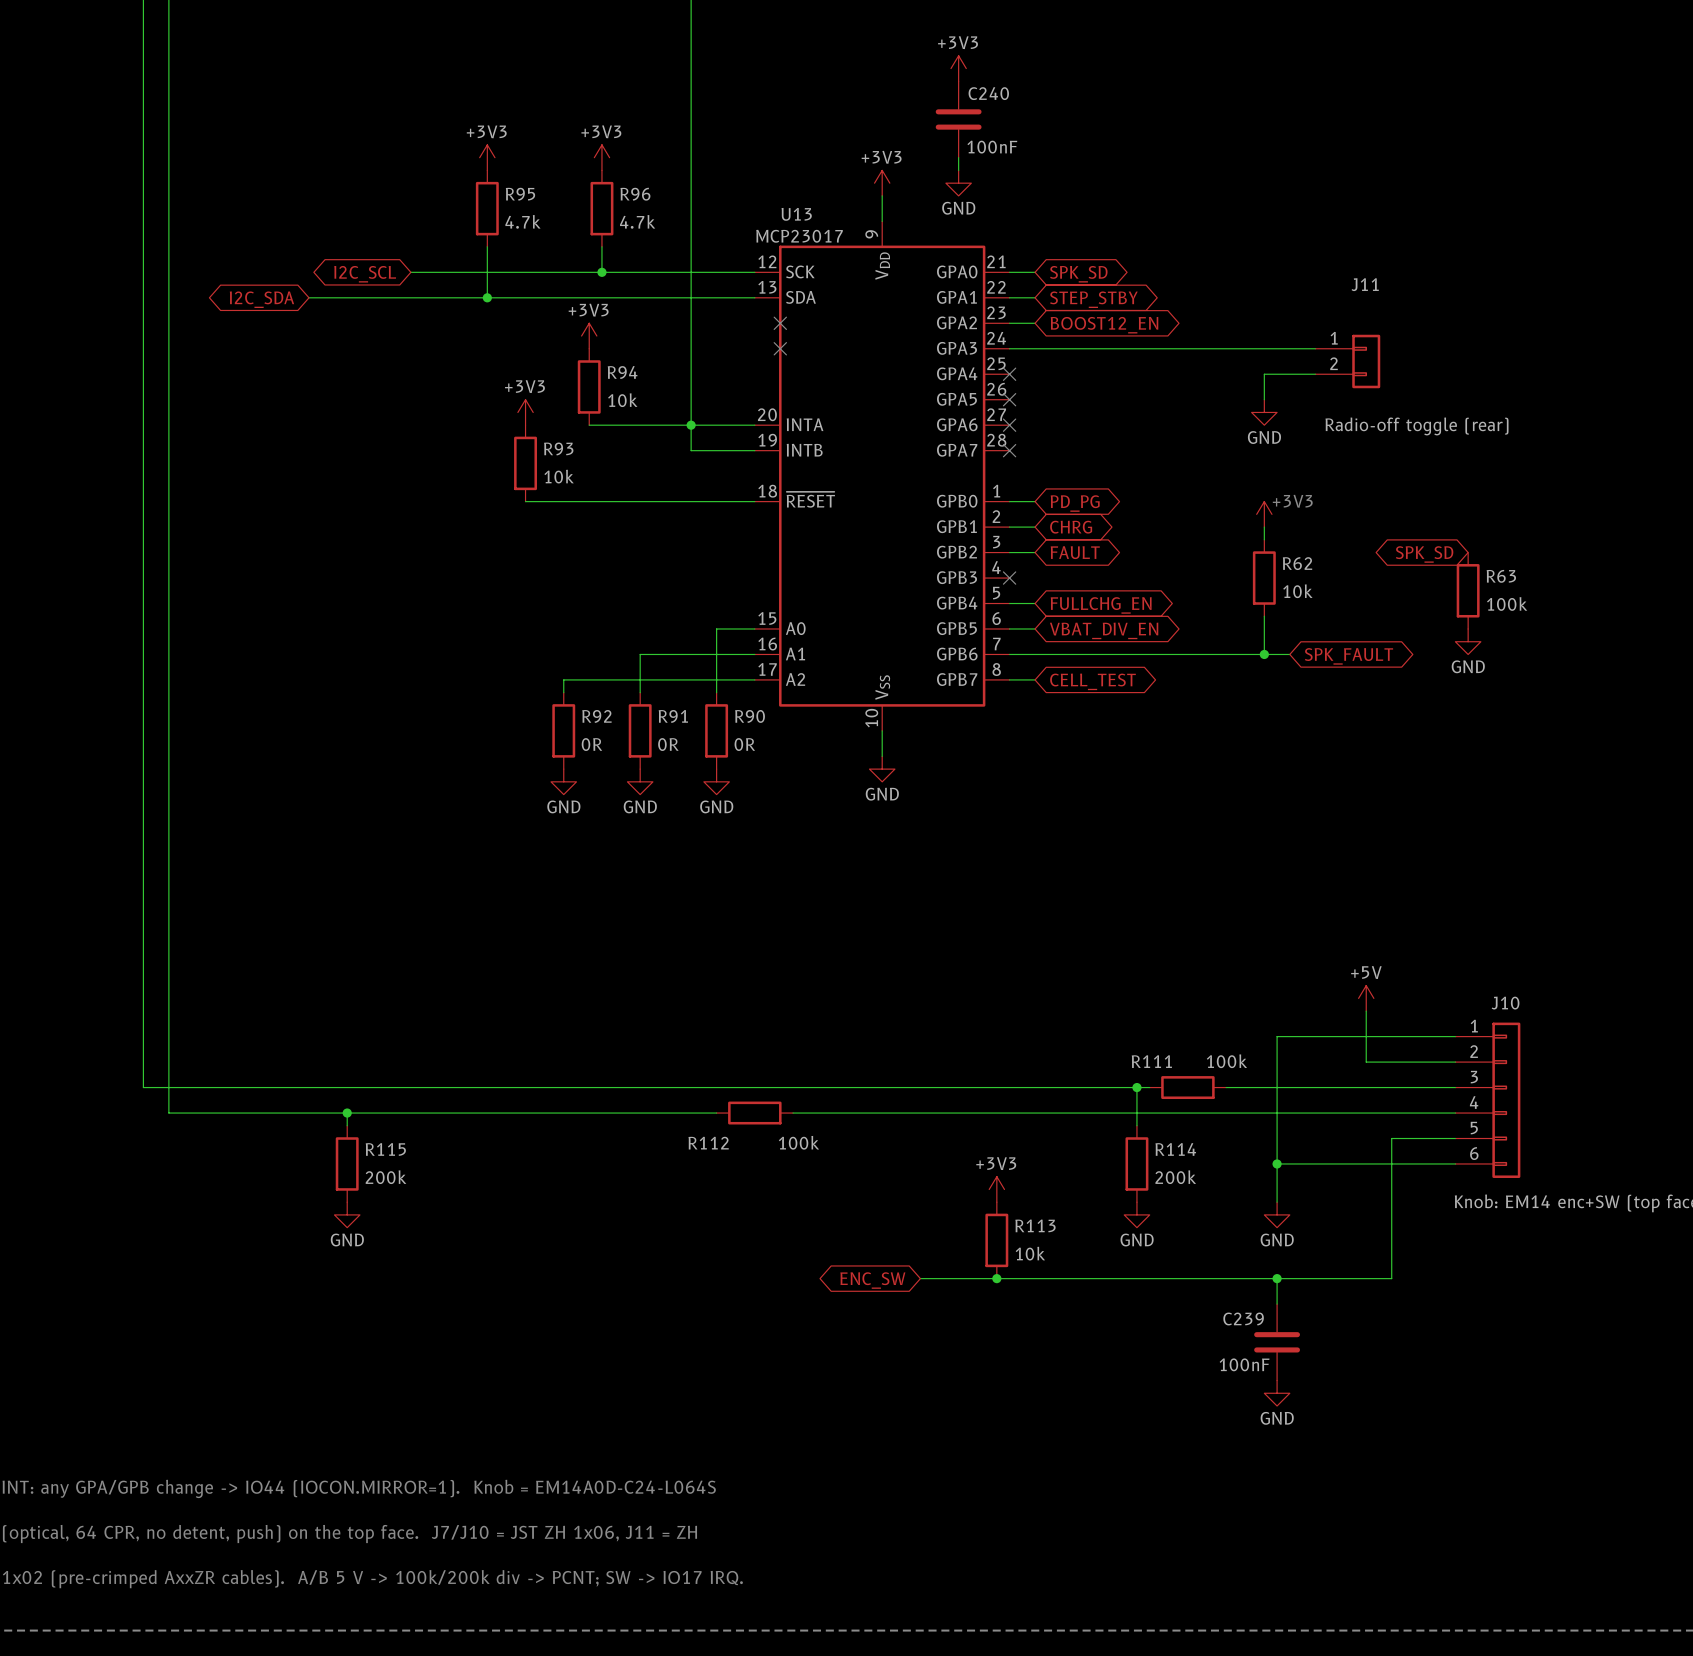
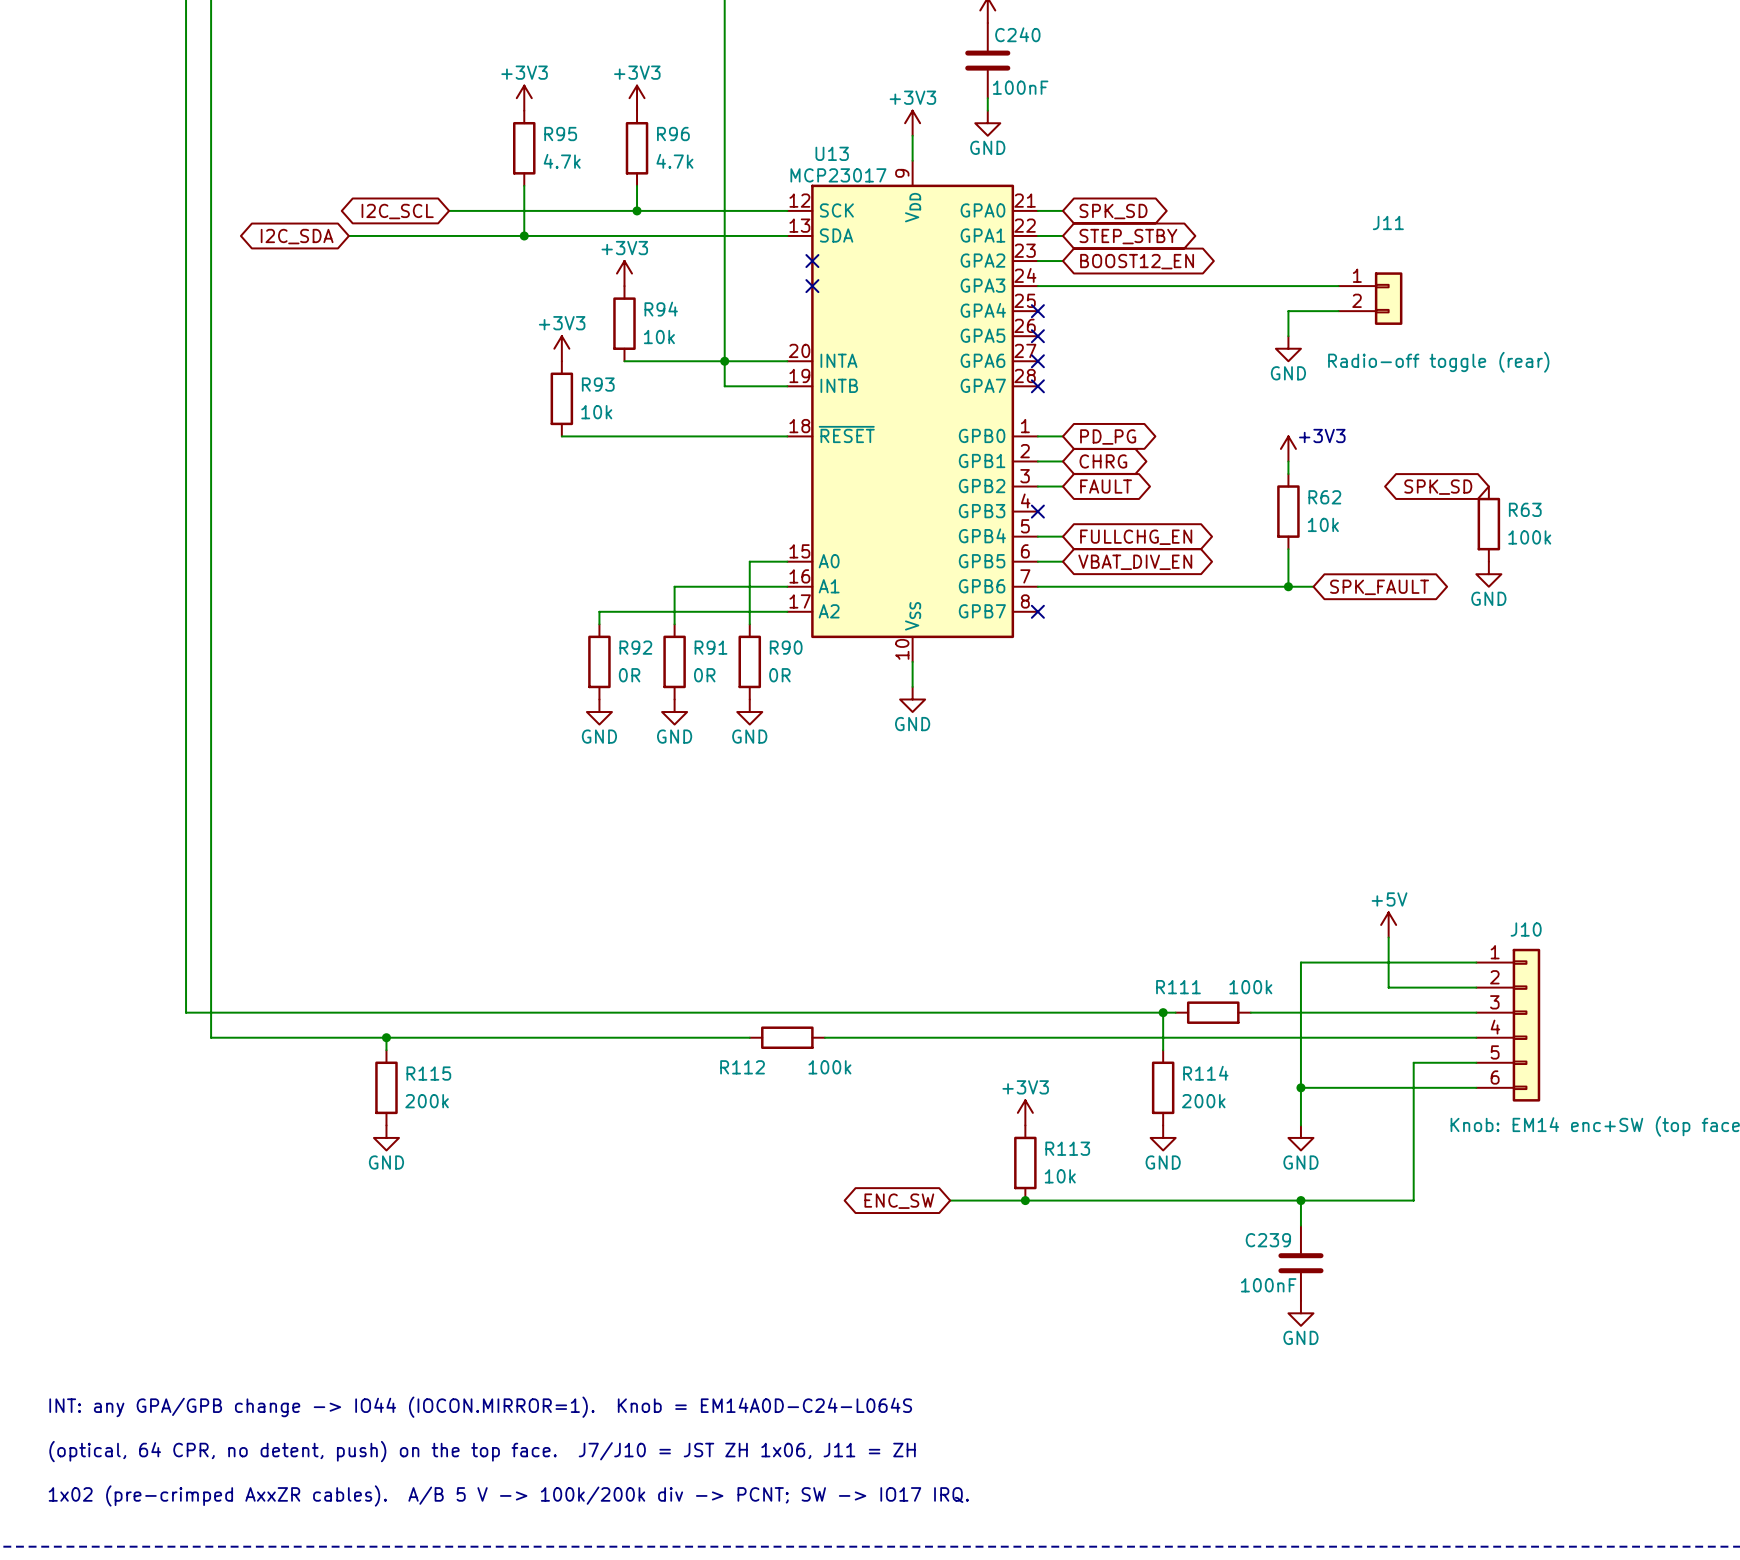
wire: (1009, 679) (1035, 679) -> none
no-connect mark: none -> (1037, 611)
global label: CELL_TEST (1092, 681) -> none

